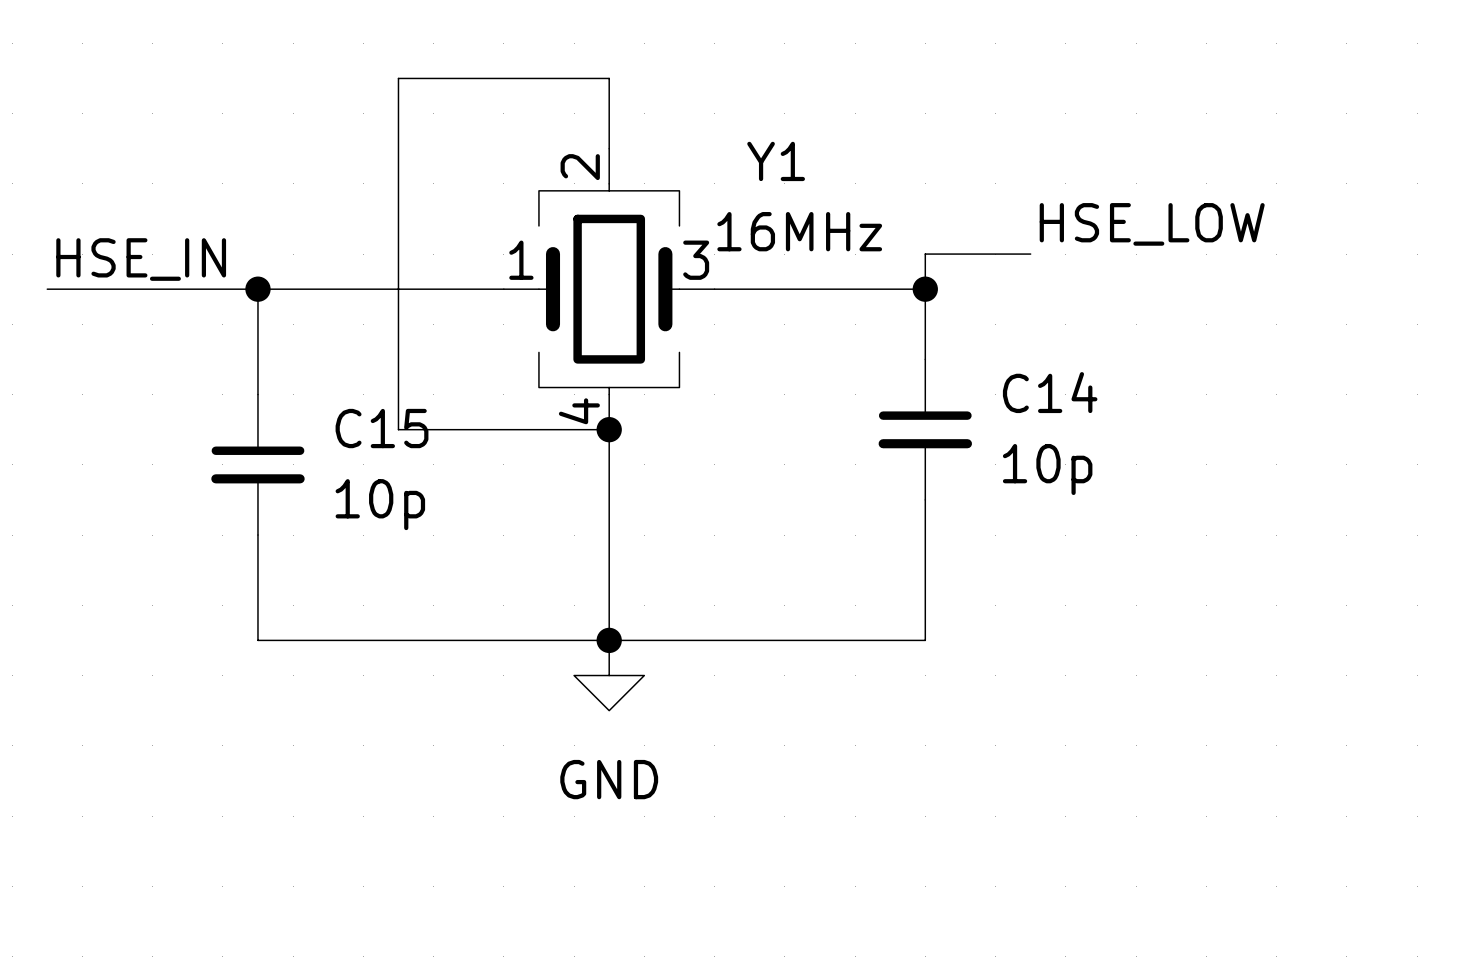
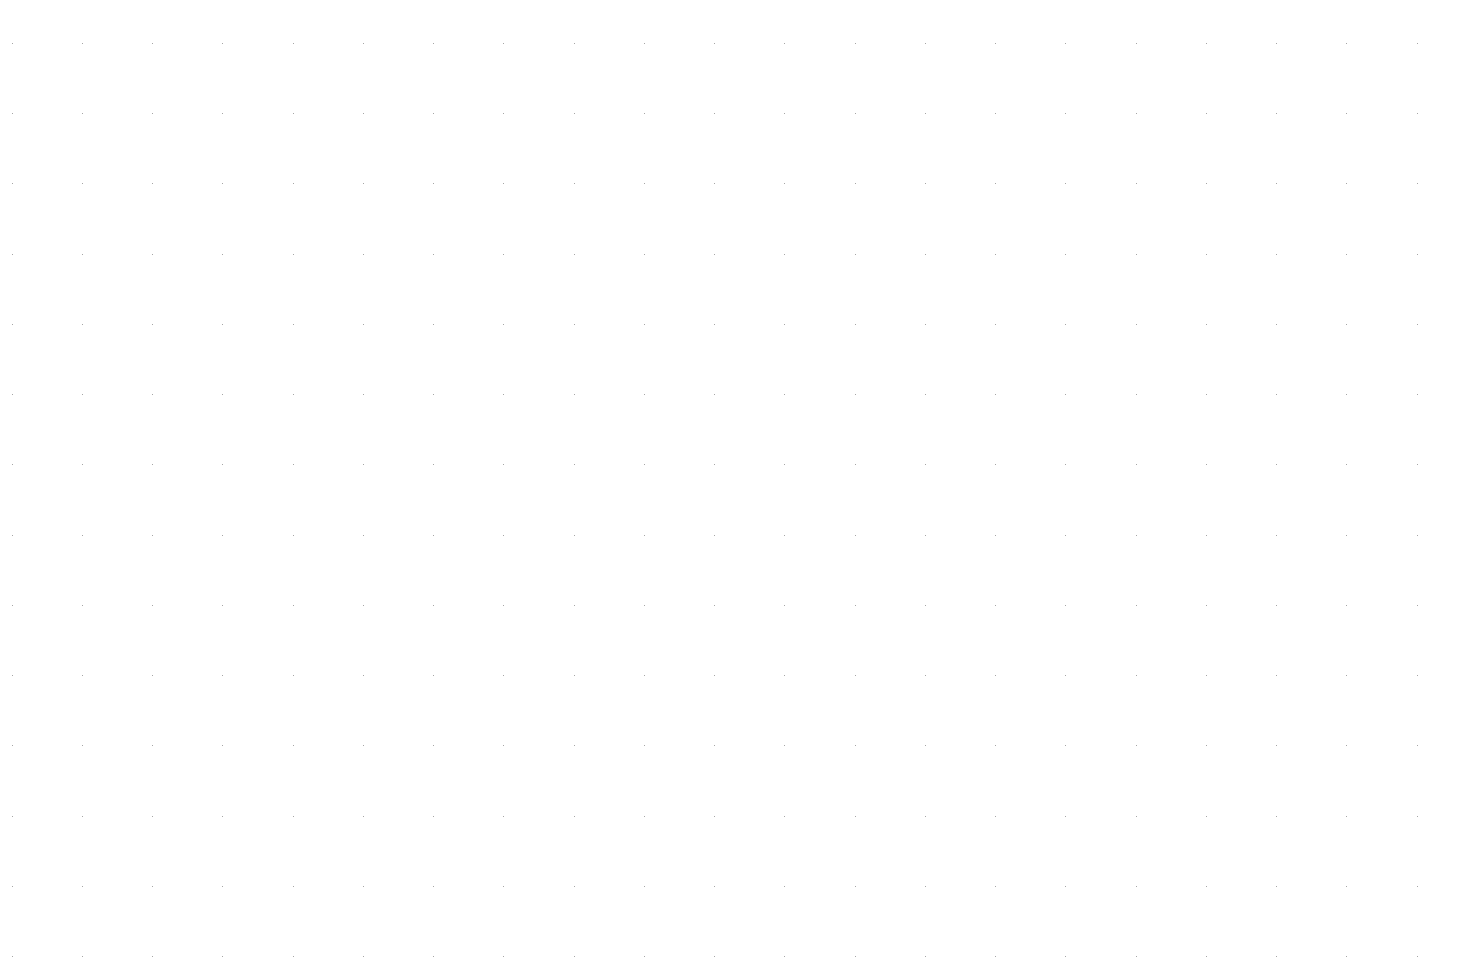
wire: (609, 148) (609, 78) (398, 78) (398, 429) (609, 429) (609, 640) -> none
label: HSE_LOW (1152, 224) -> none
wire: (1030, 254) (925, 254) (925, 359) -> none
label: HSE_IN (141, 259) -> none
wire: (47, 289) (503, 289) -> none
wire: (257, 289) (257, 394) -> none
junction: (257, 289) -> none
Y1: 16MHz (609, 289) -> none
wire: (714, 289) (925, 289) -> none
junction: (925, 289) -> none
junction: (609, 429) -> none
C14: 10p (925, 429) -> none
C15: 10p (257, 464) -> none
wire: (925, 499) (925, 640) (257, 640) (257, 535) -> none
junction: (609, 640) -> none
power symbol: GND (609, 675) -> none

